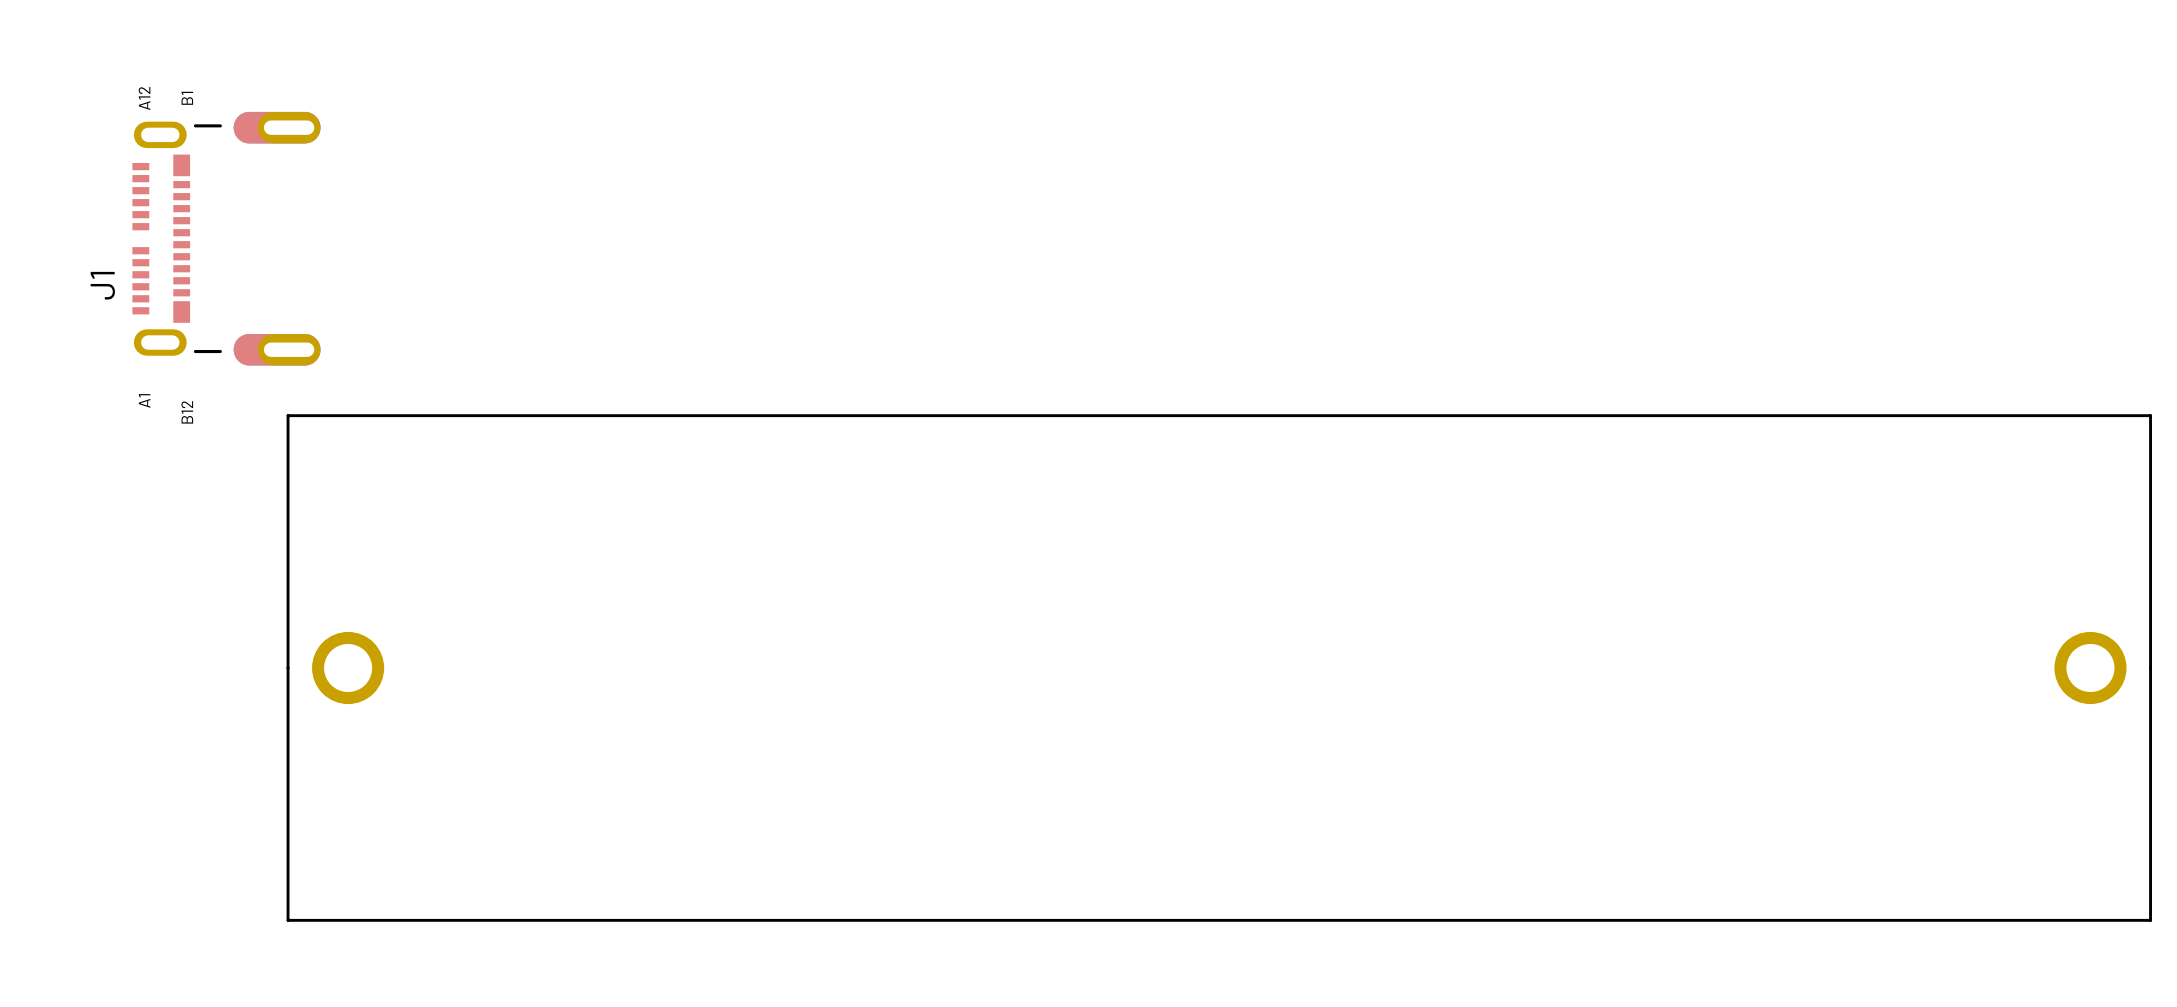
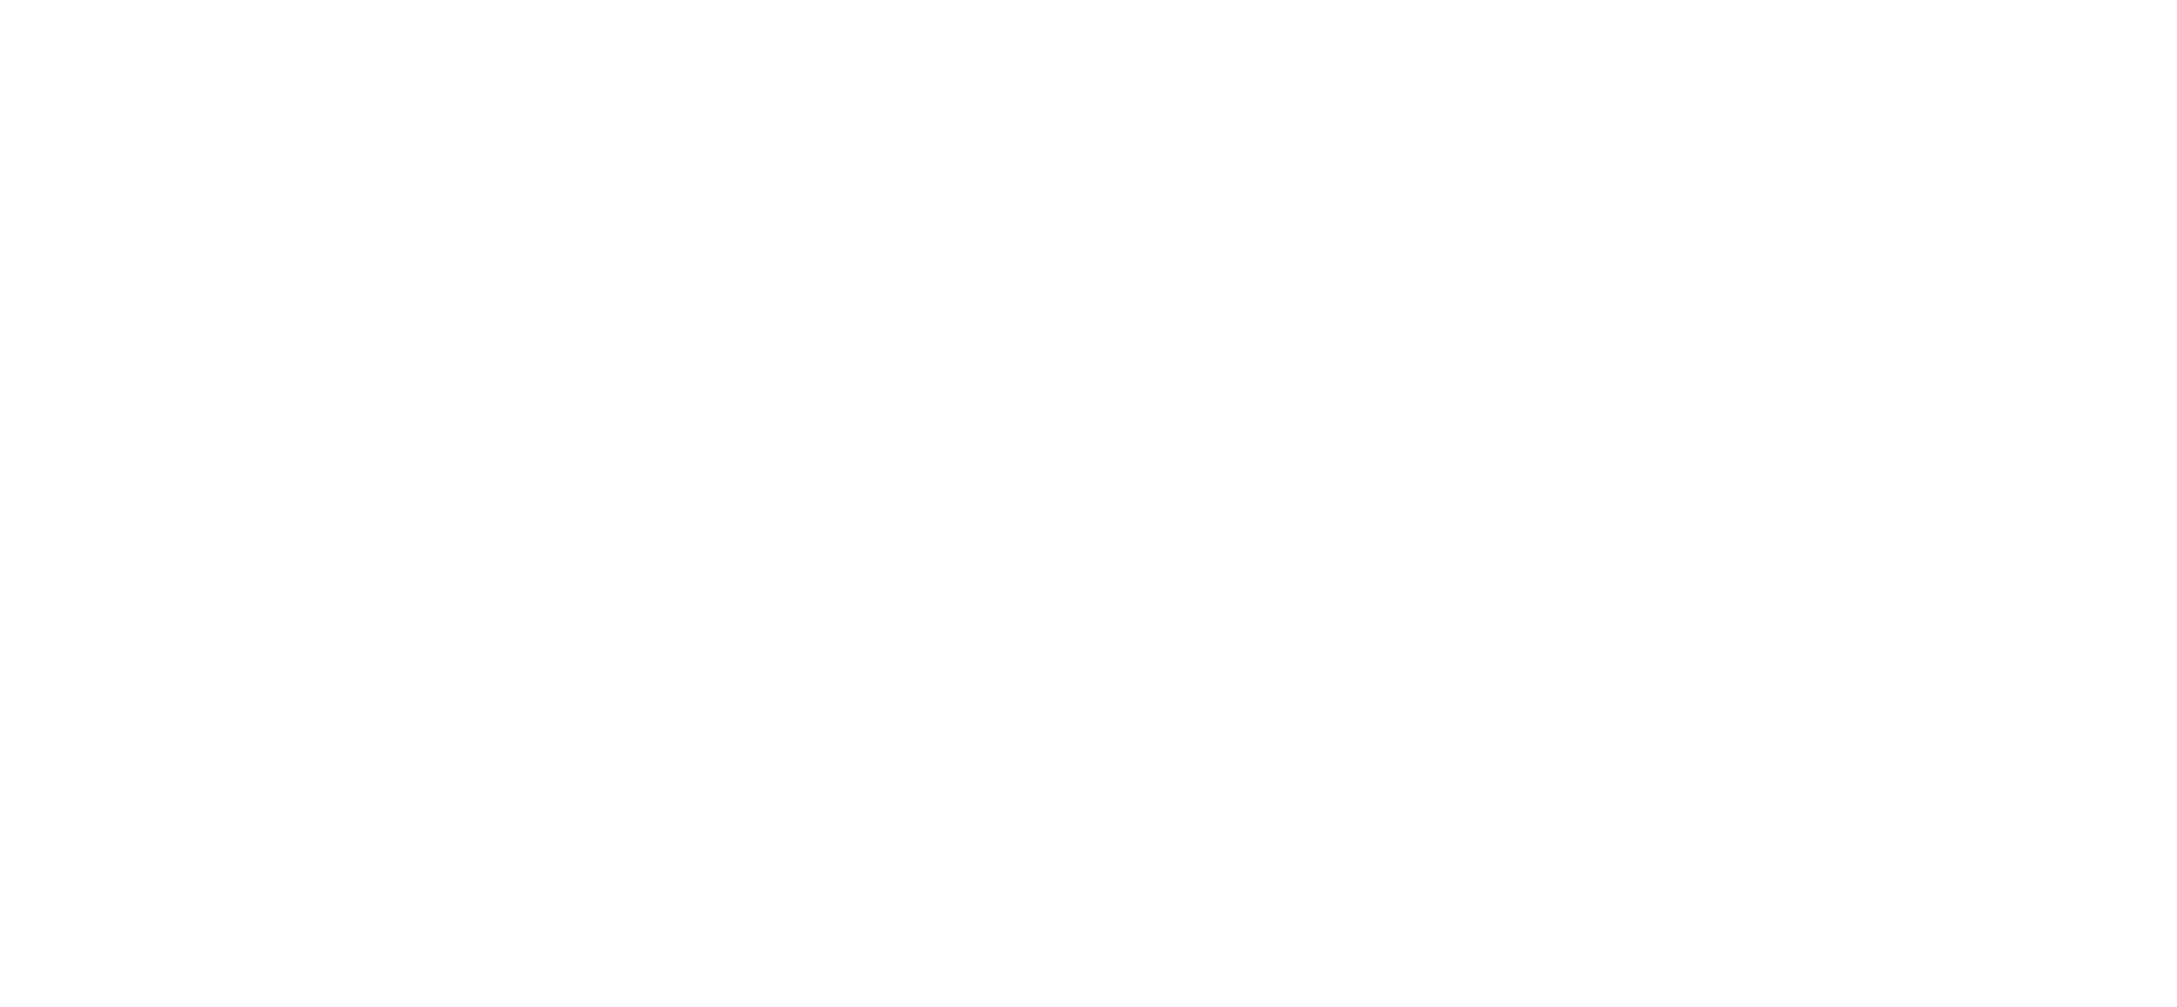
J1: (226, 238) -> none
part: (1219, 668) -> none

